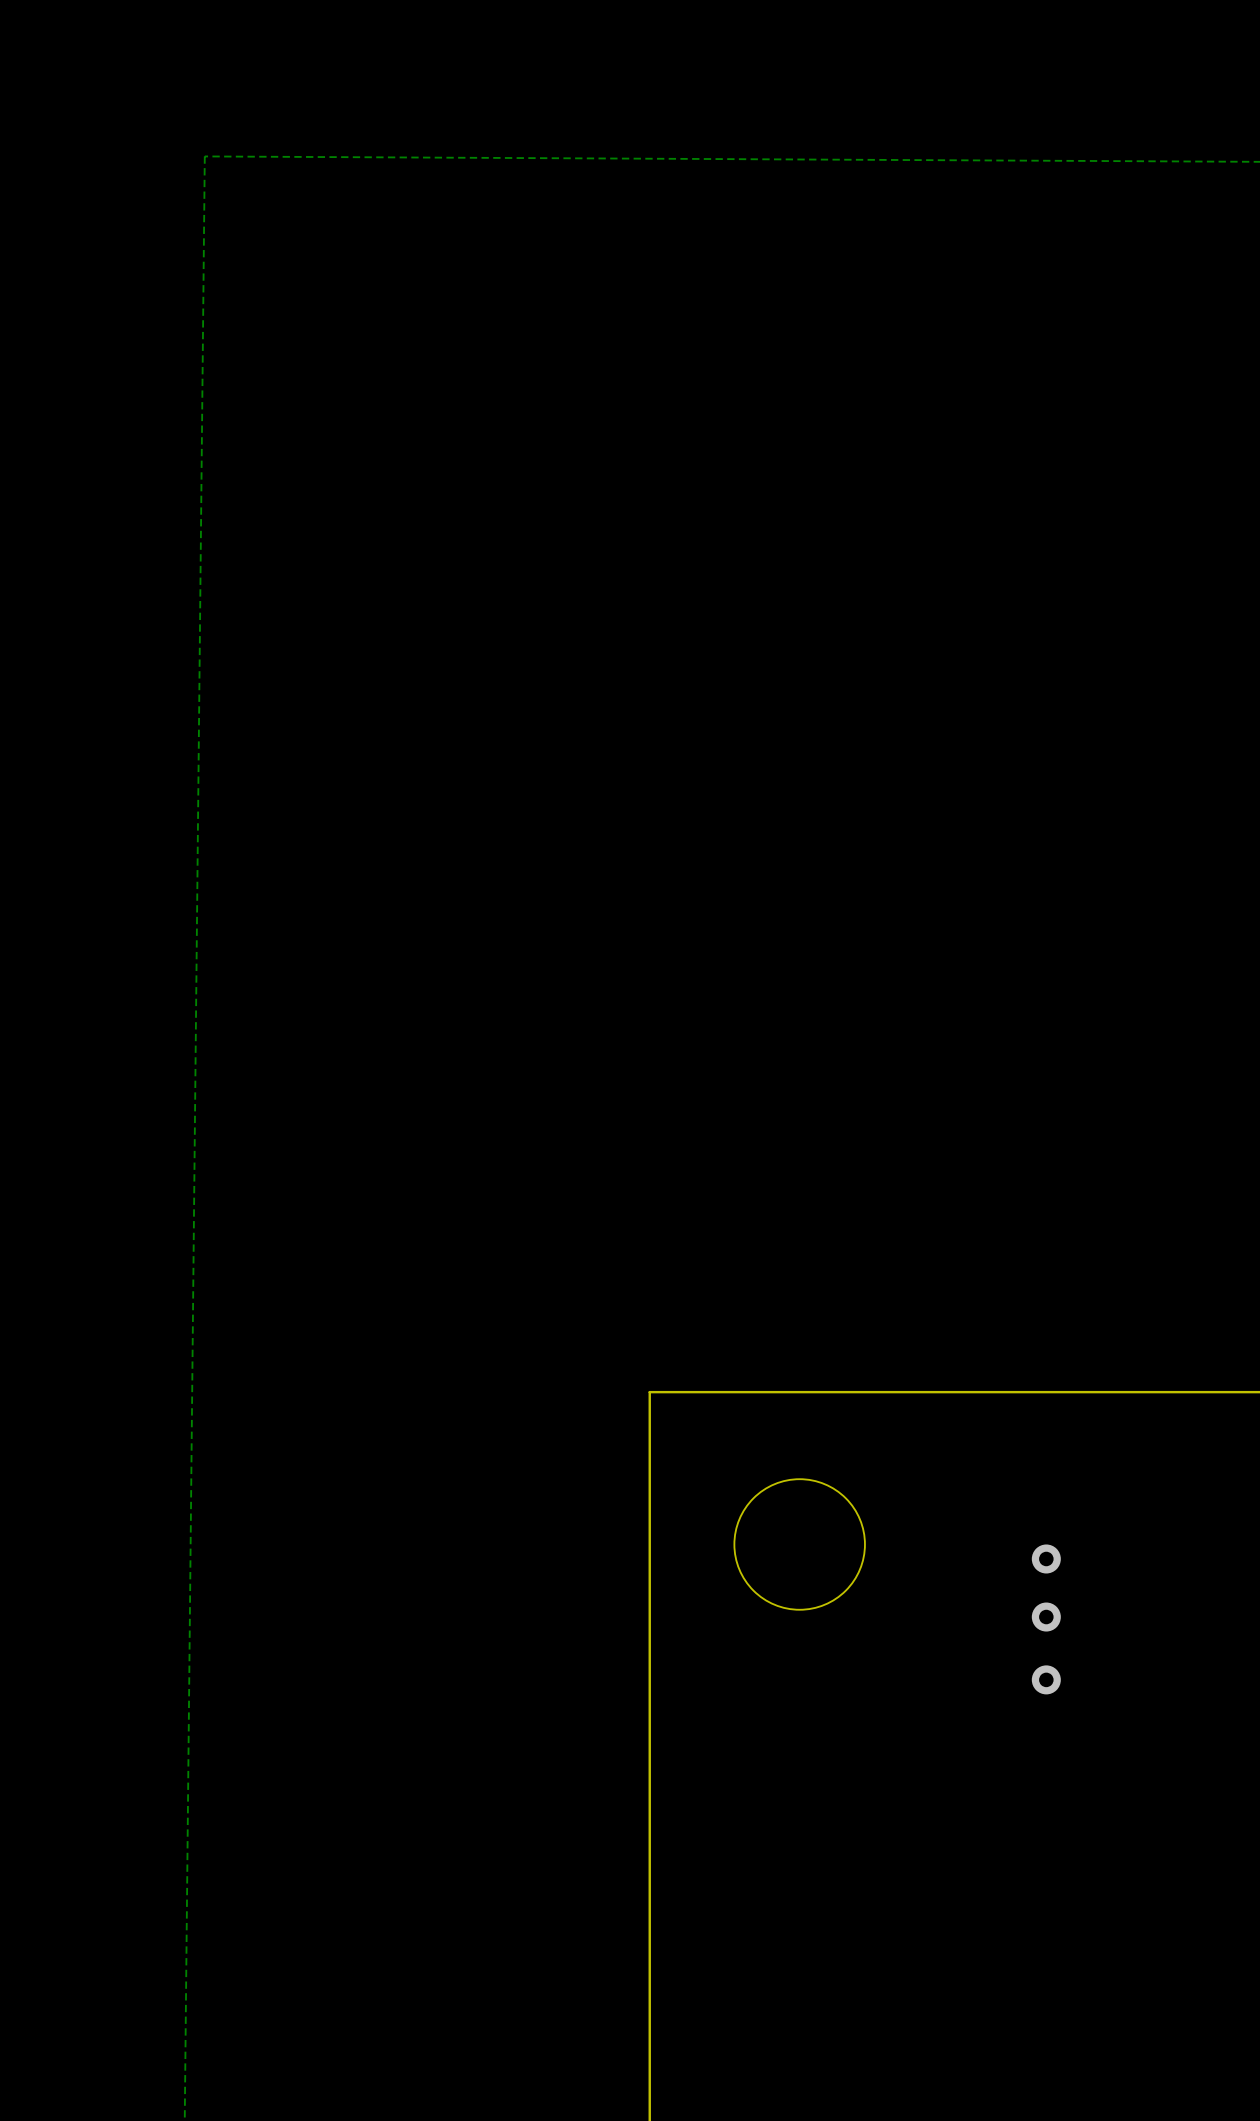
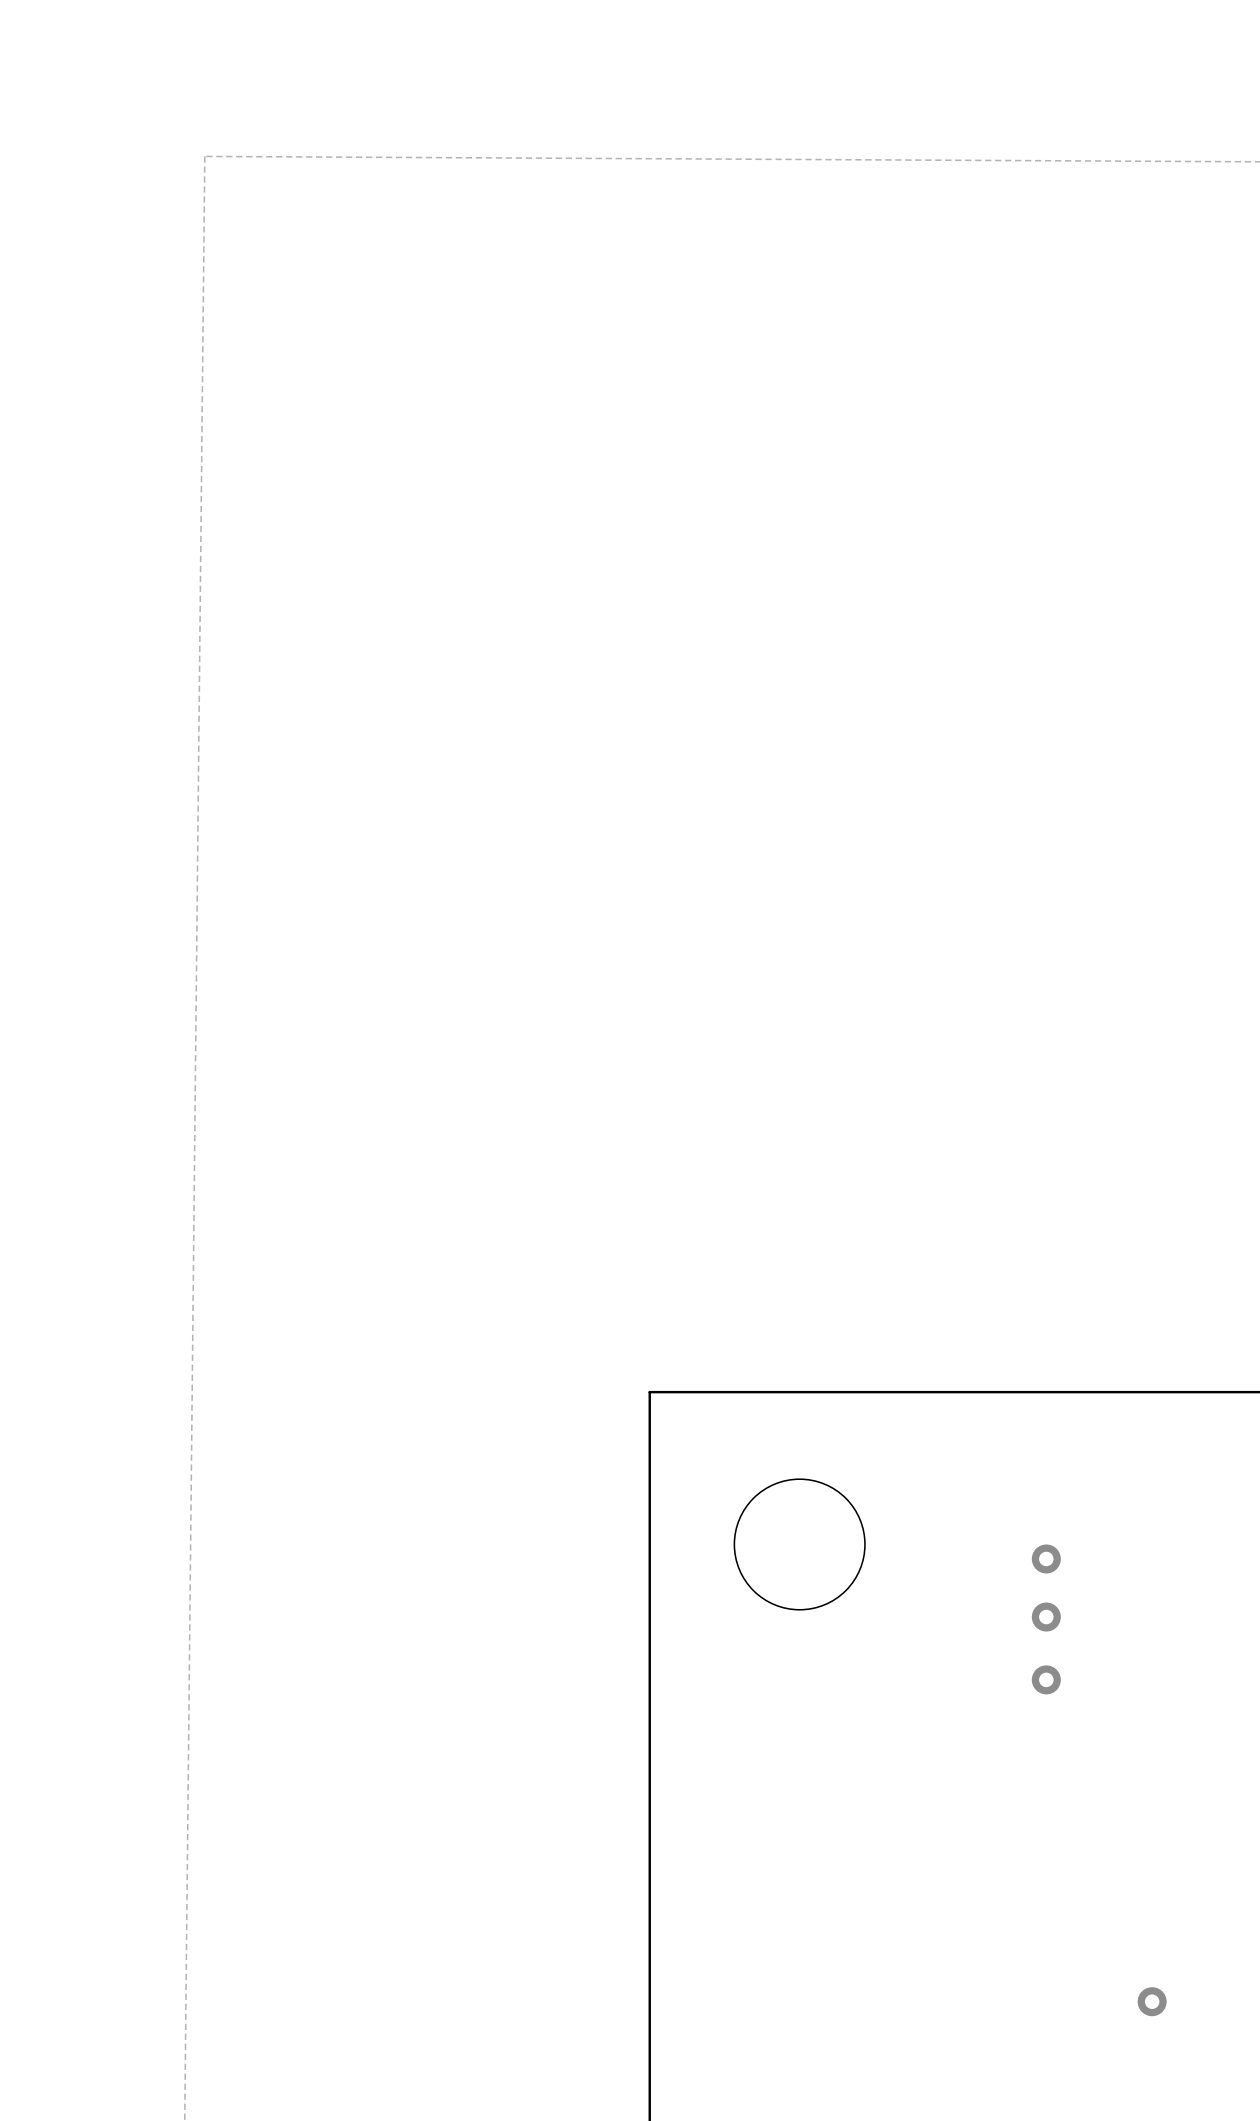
via: none -> (1152, 2001)

